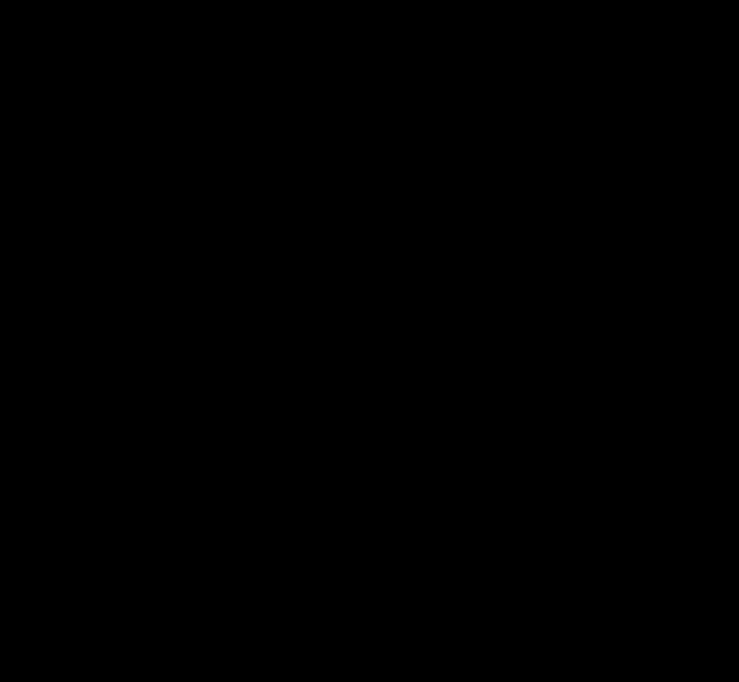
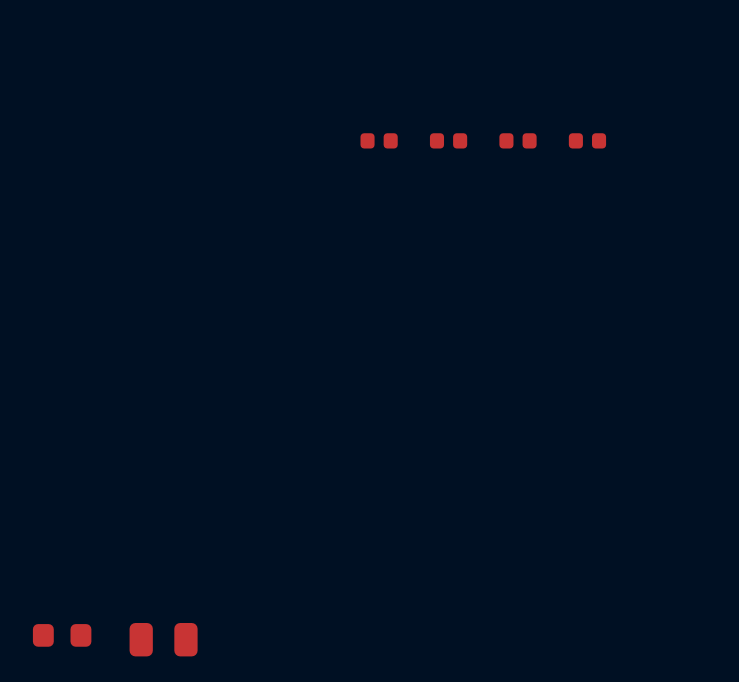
part: none -> (379, 140)
part: none -> (448, 140)
part: none -> (518, 140)
part: none -> (587, 140)
part: none -> (62, 635)
part: none -> (163, 639)

